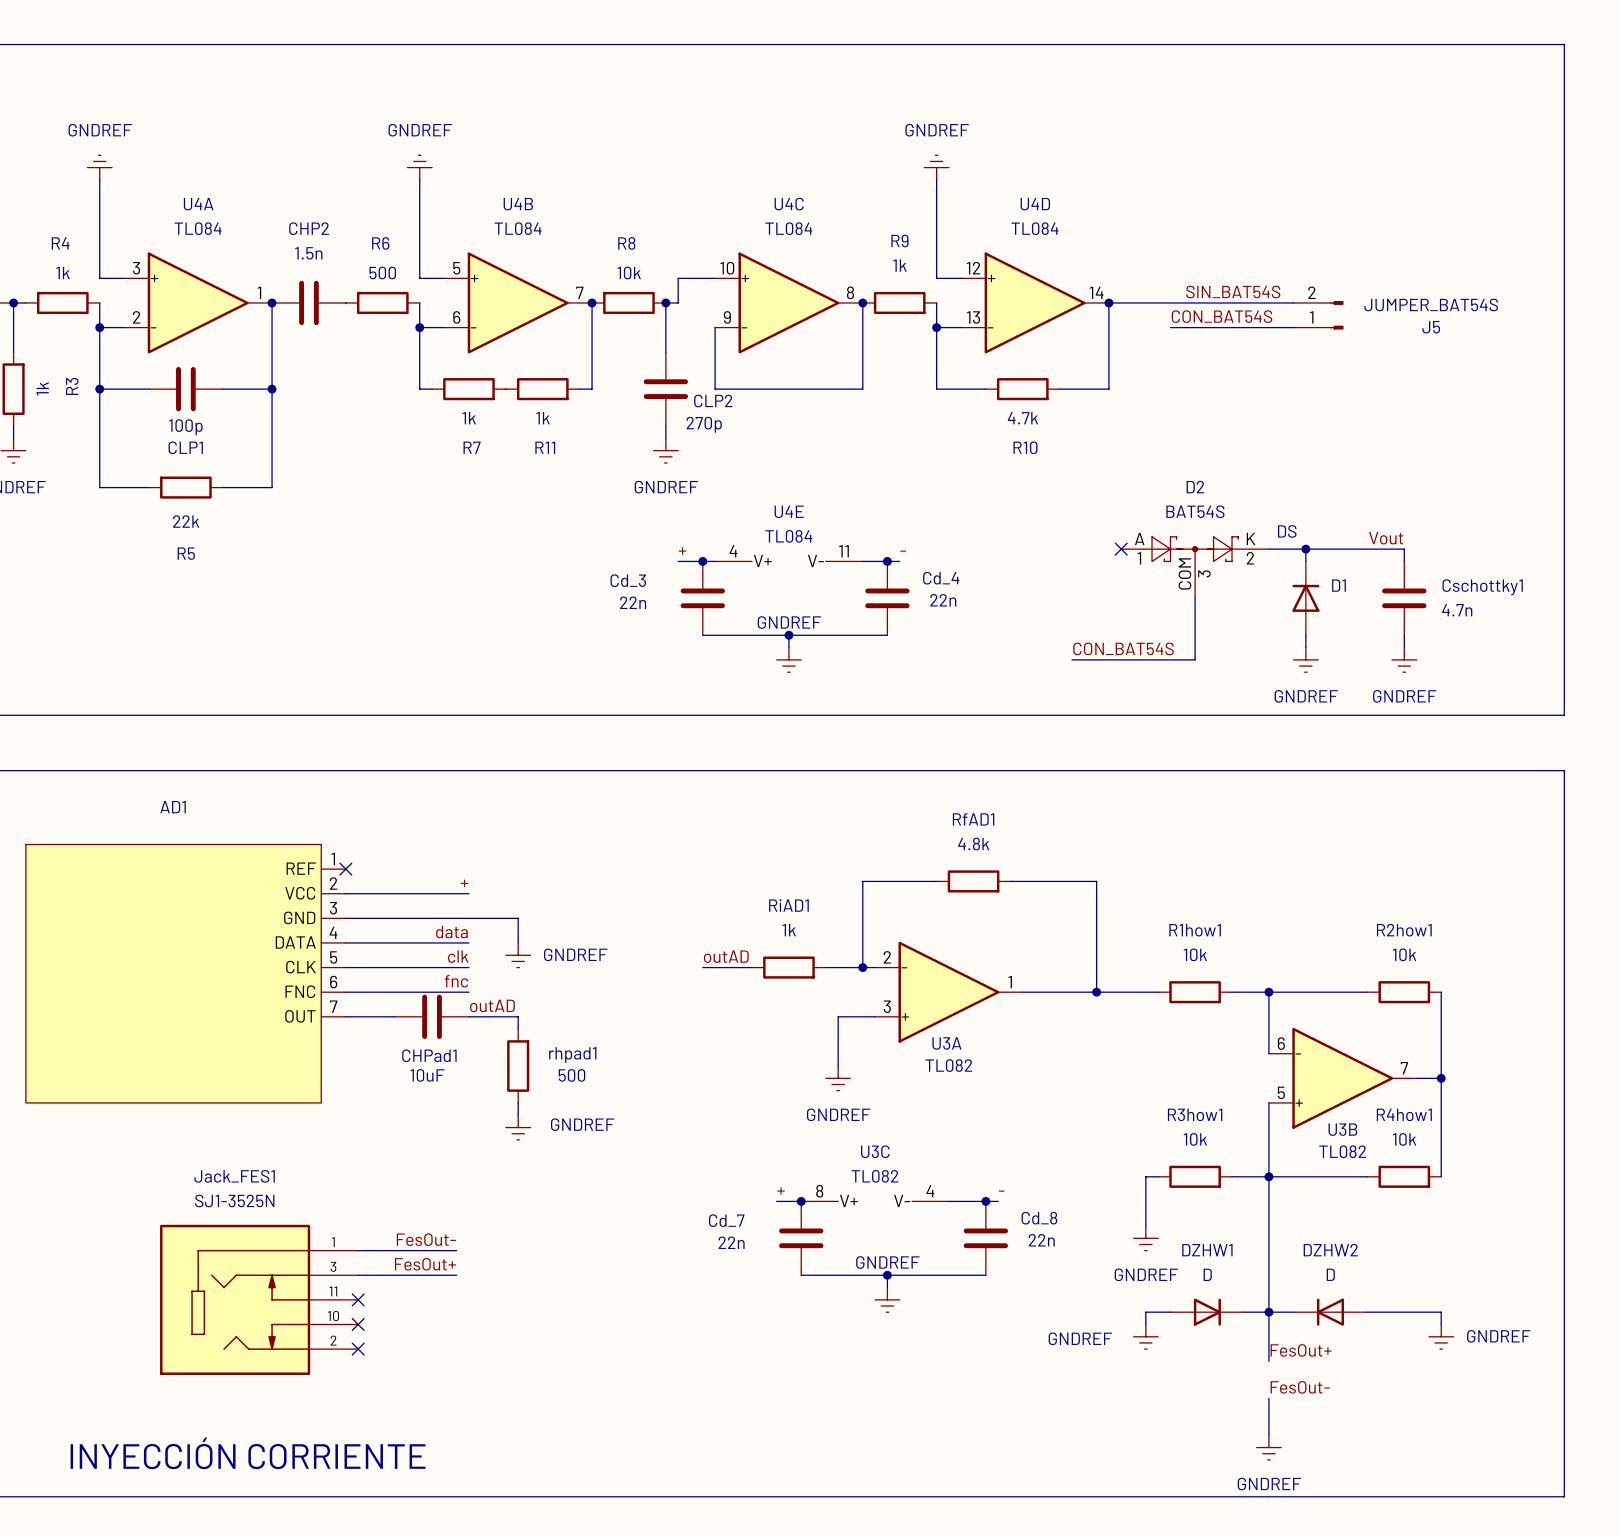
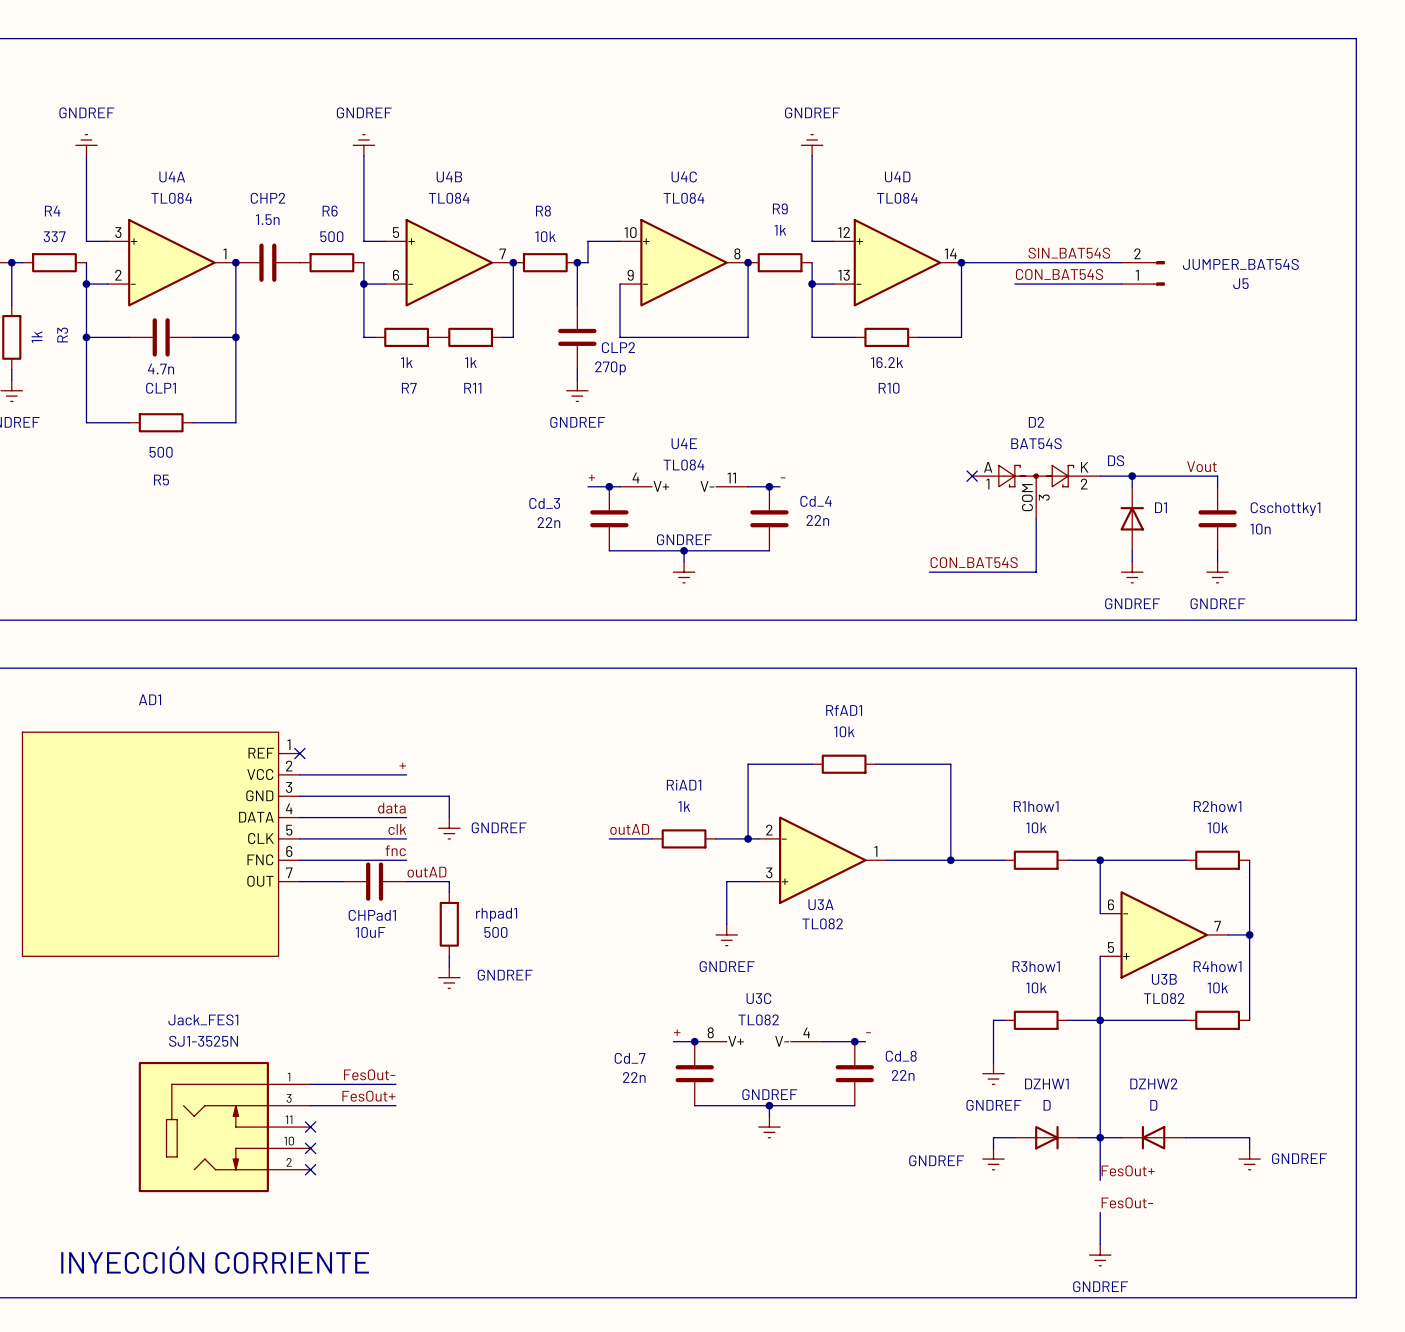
R4 value: 1k (63, 272) -> 337 (54, 236)
R10 value: 4.7k (1022, 418) -> 16.2k (887, 362)
CLP1 value: 100p (185, 427) -> 4.7n (160, 369)
R5 value: 22k (186, 521) -> 500 (161, 452)
Cschottky1 value: 4.7n (1457, 610) -> 10n (1260, 529)
RfAD1 value: 4.8k (973, 844) -> 10k (844, 731)

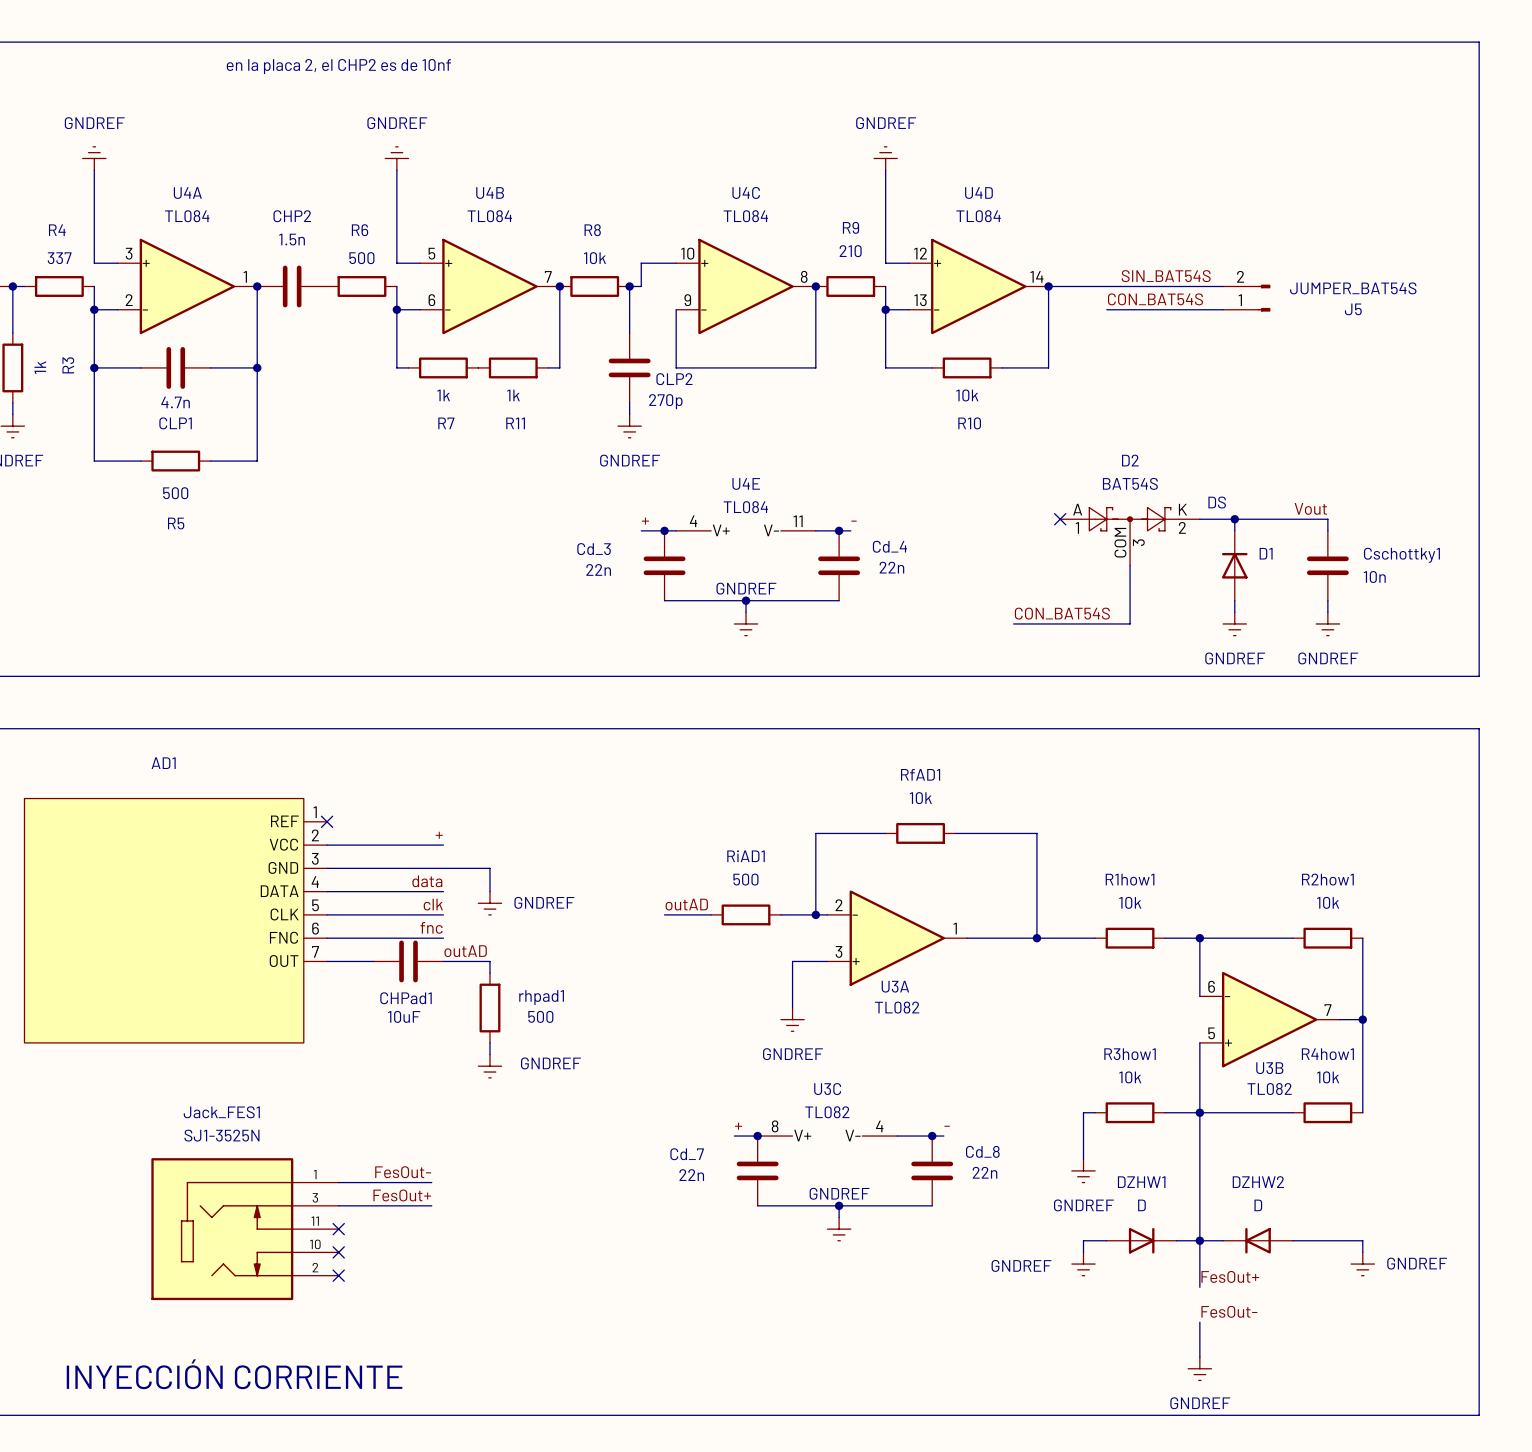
text: none -> en la placa 2, el CHP2 es de 10nf (338, 66)
R9 value: 1k (780, 230) -> 210 (850, 251)
R10 value: 16.2k (887, 362) -> 10k (967, 395)
RiAD1 value: 1k (684, 806) -> 500 (745, 879)

